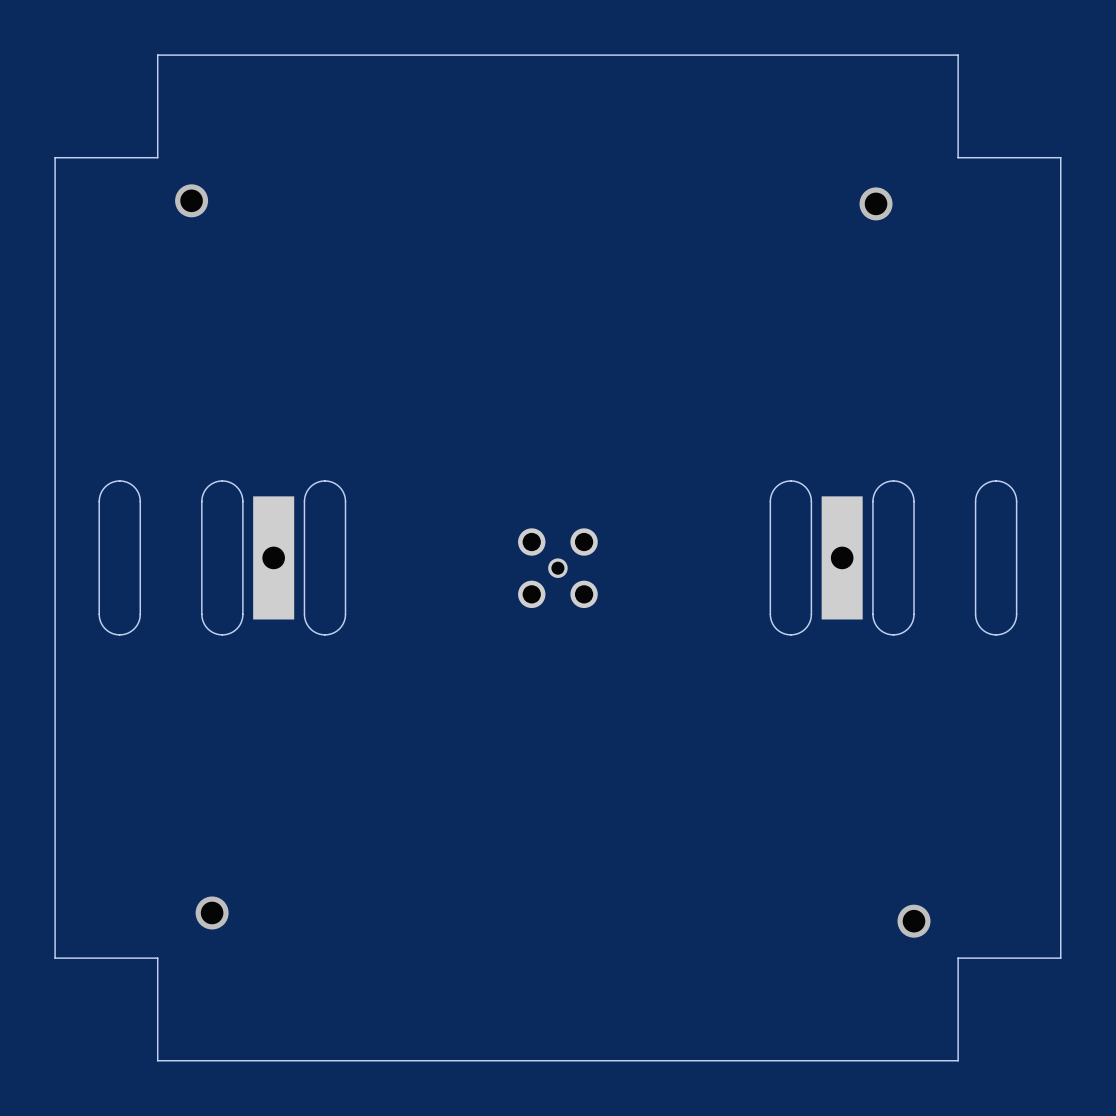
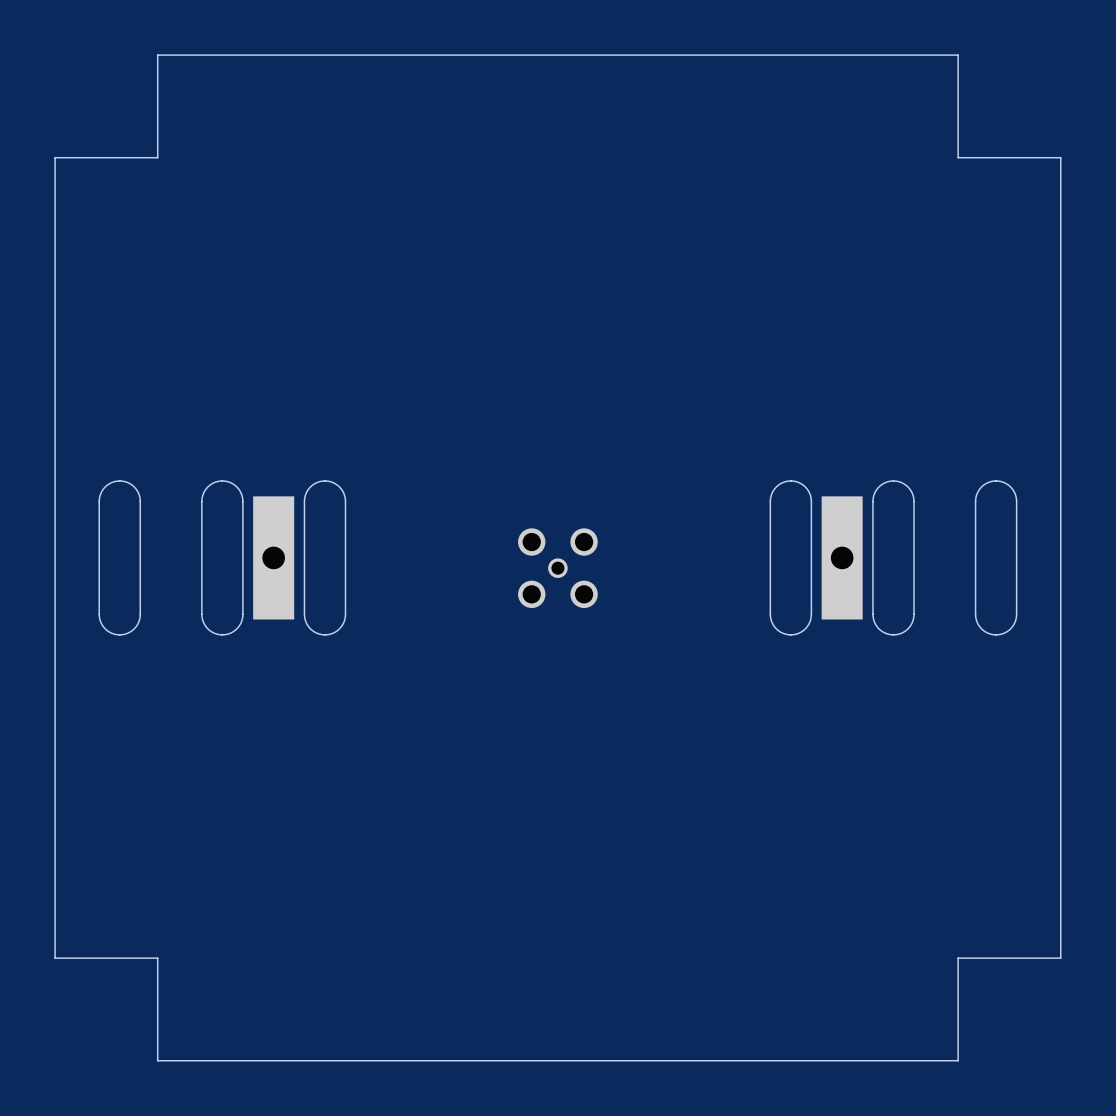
via: (191, 200) -> none
via: (876, 203) -> none
via: (212, 912) -> none
via: (914, 921) -> none

